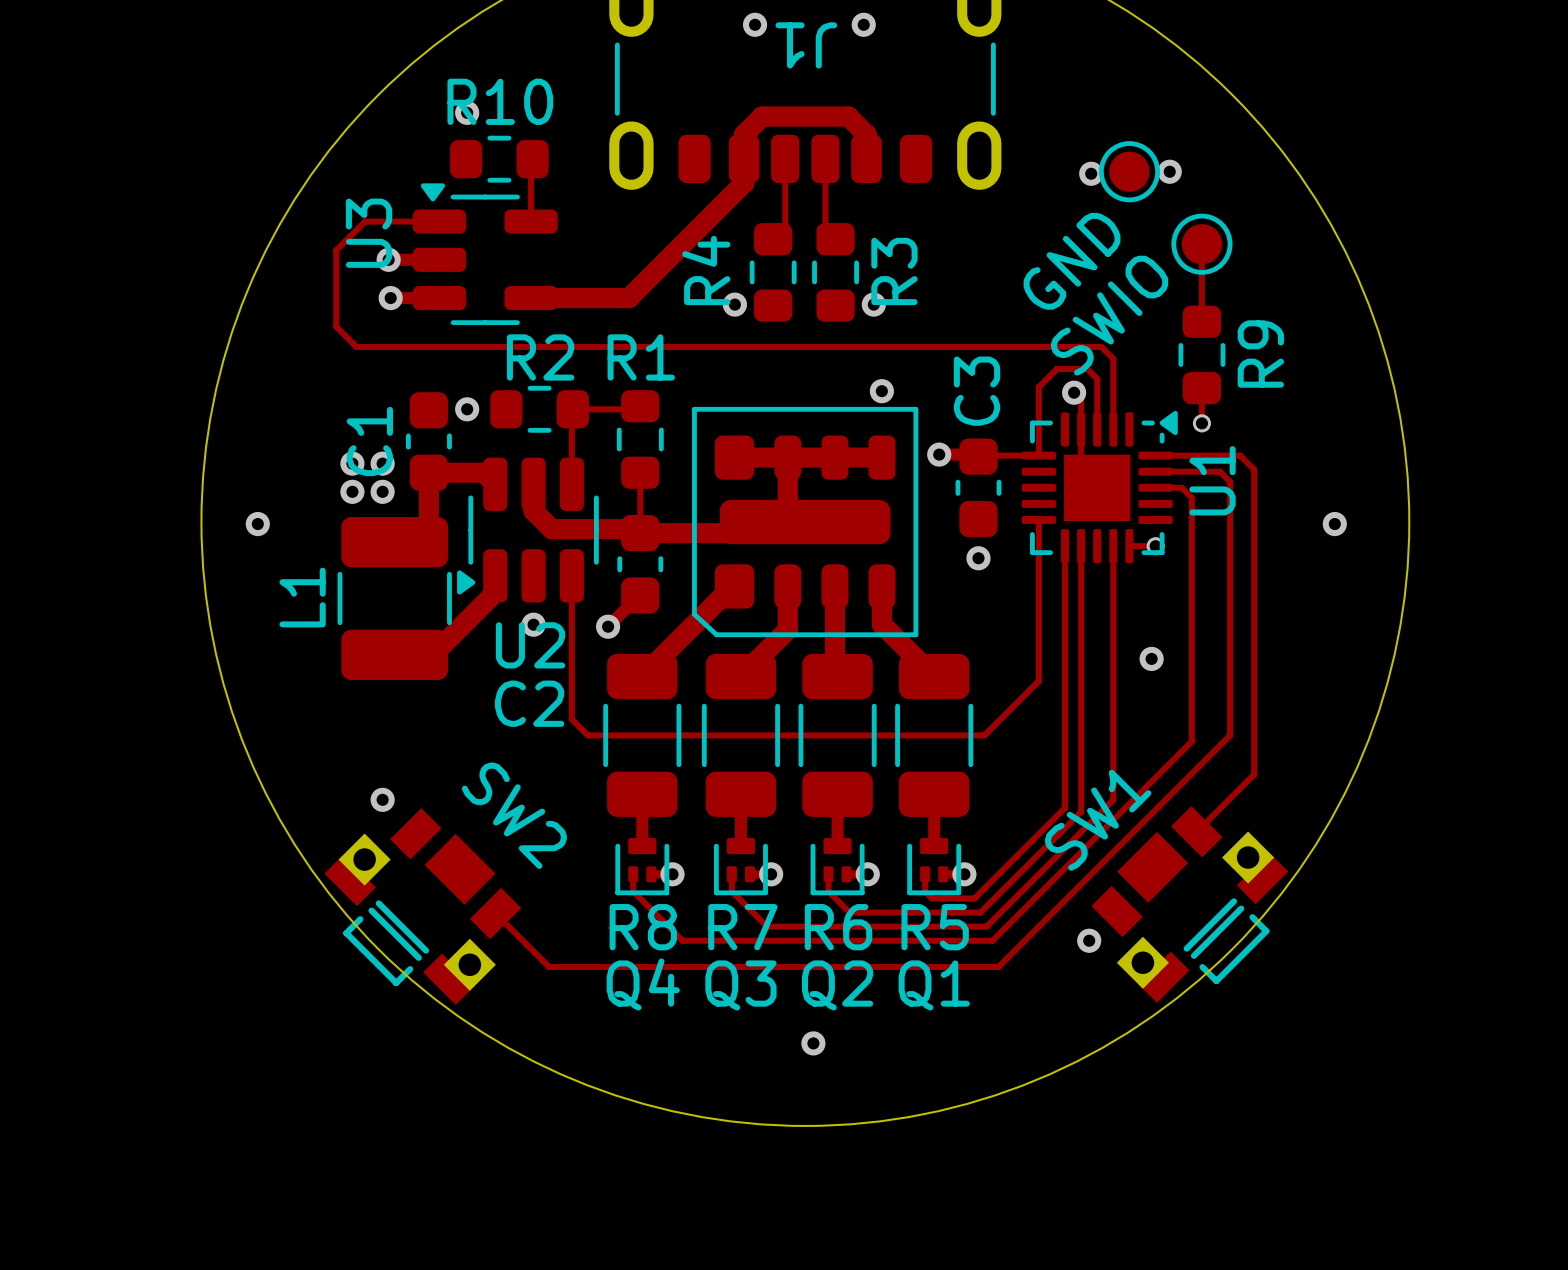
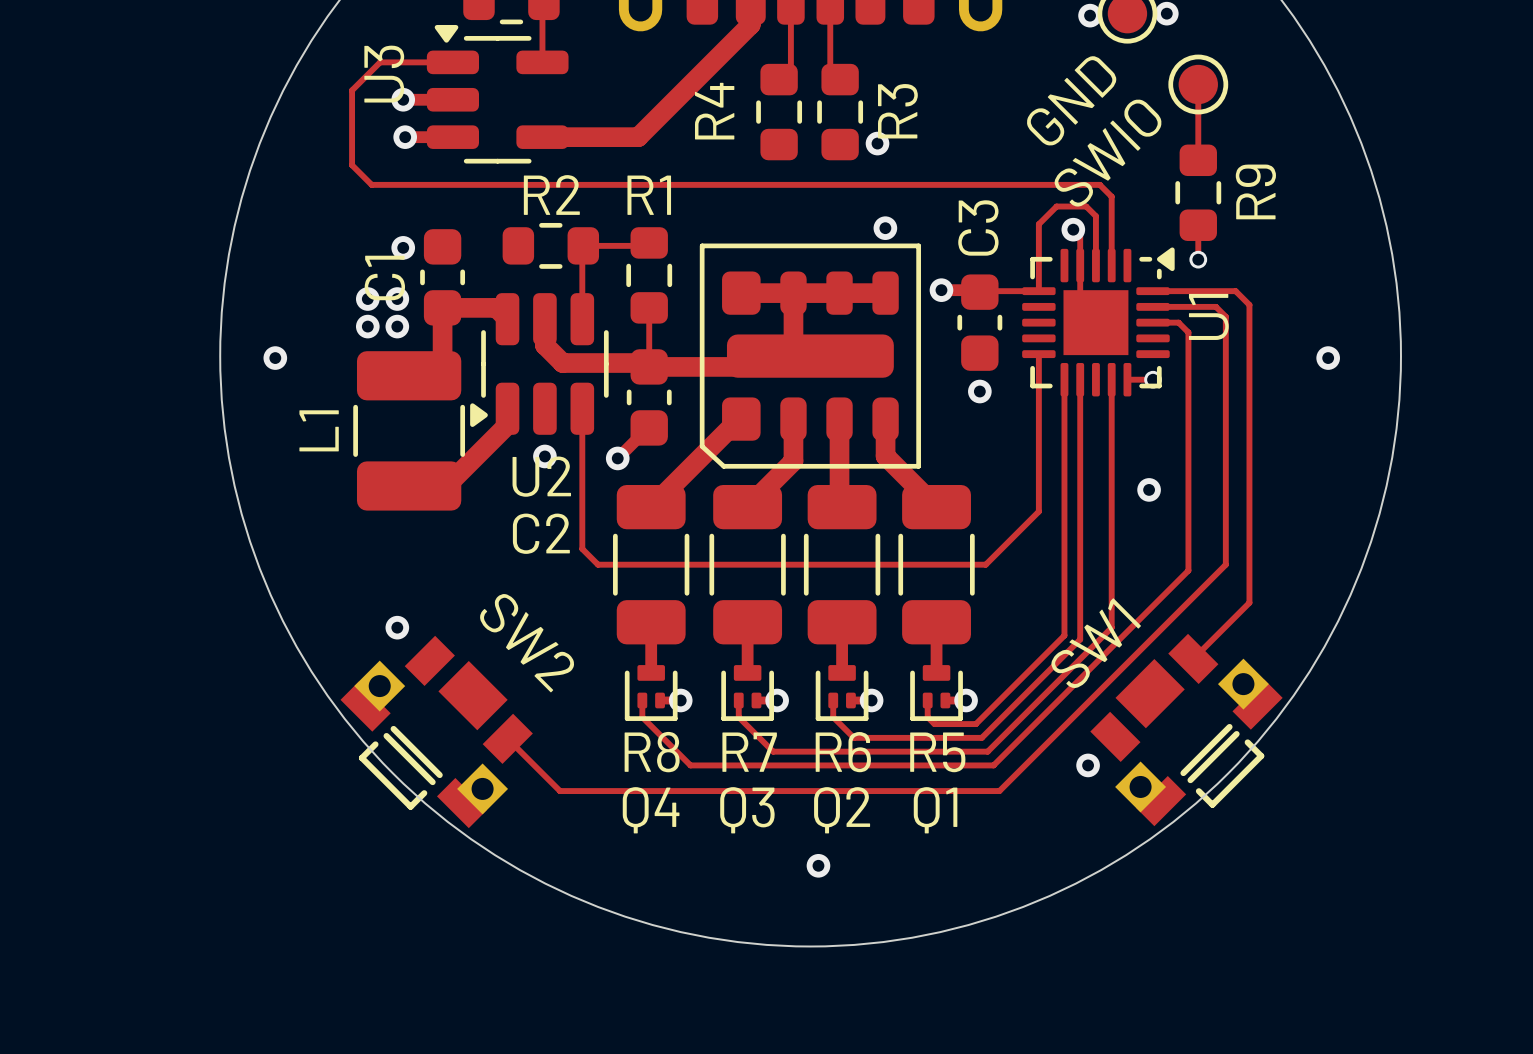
via: (734, 304) -> none
via position: (467, 409) -> (403, 247)

